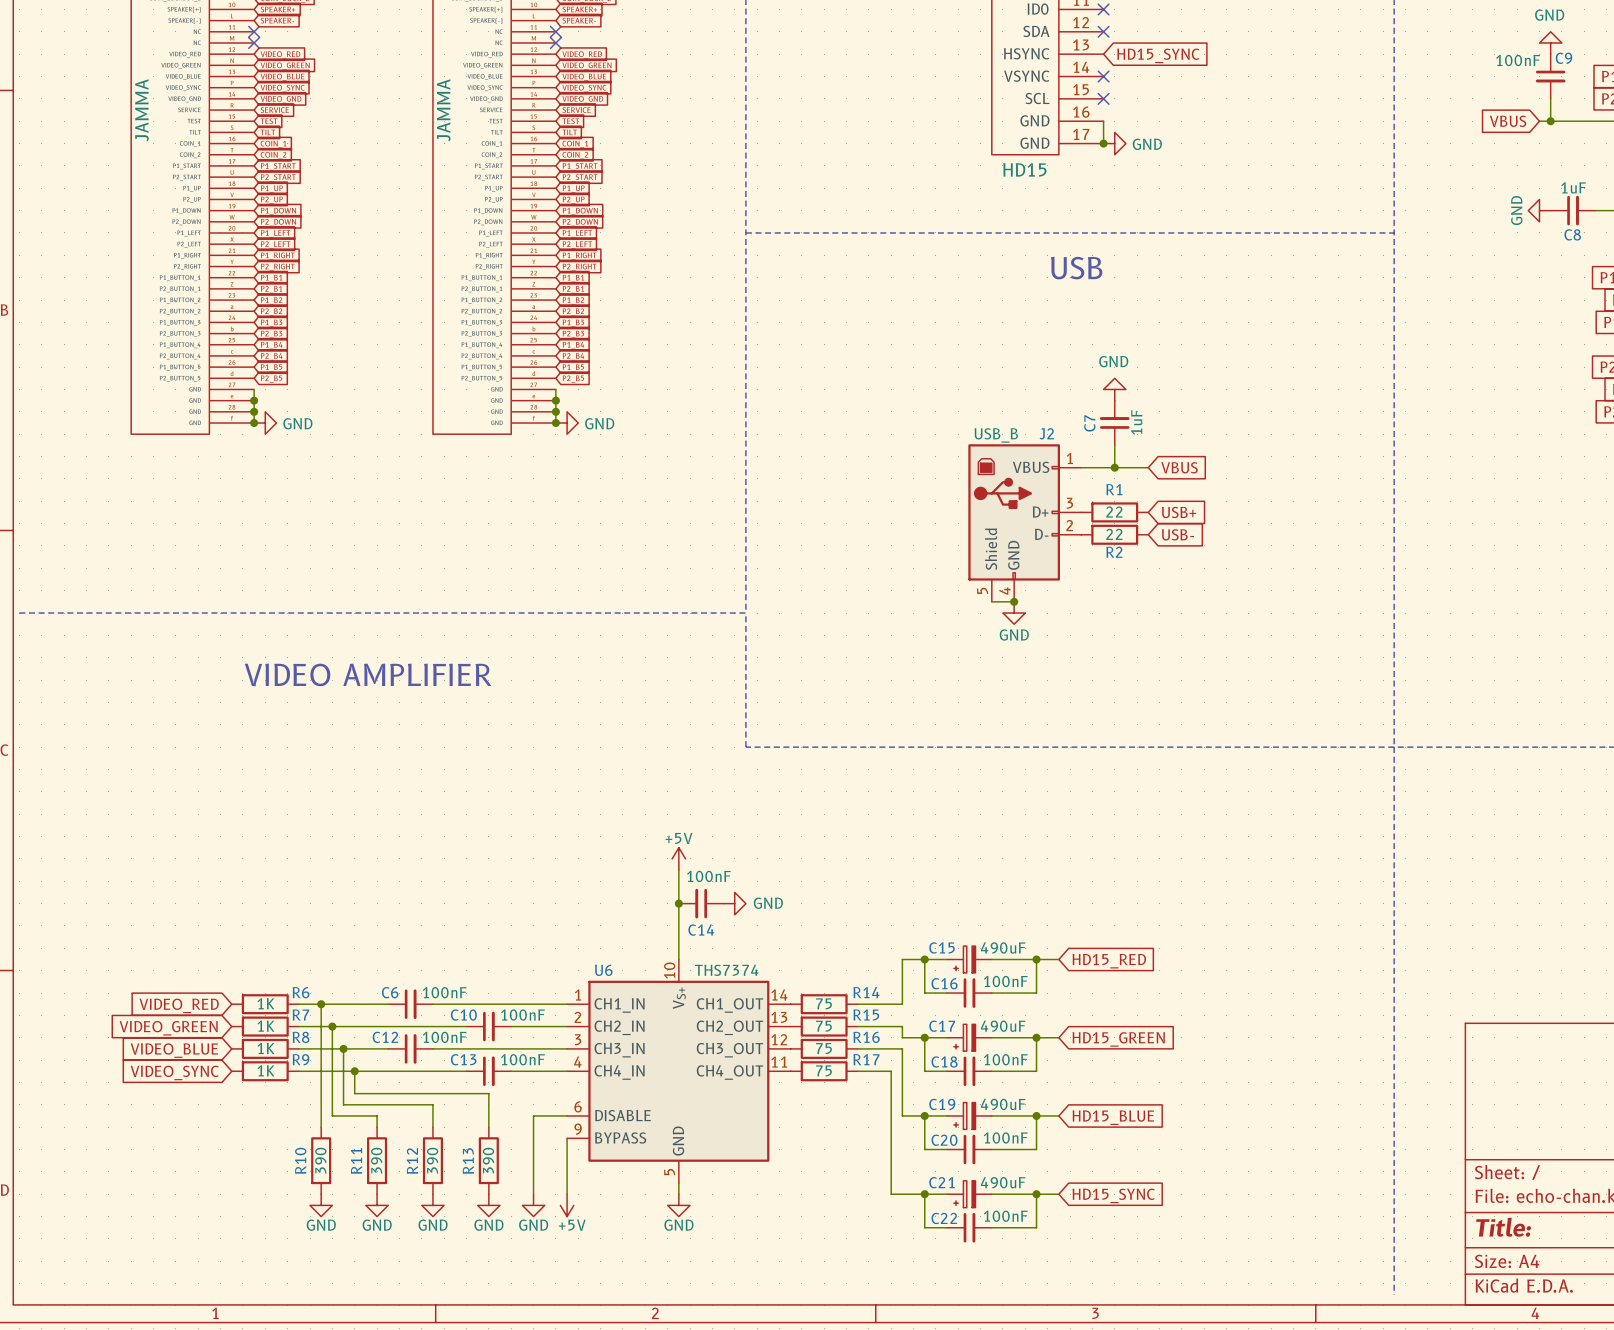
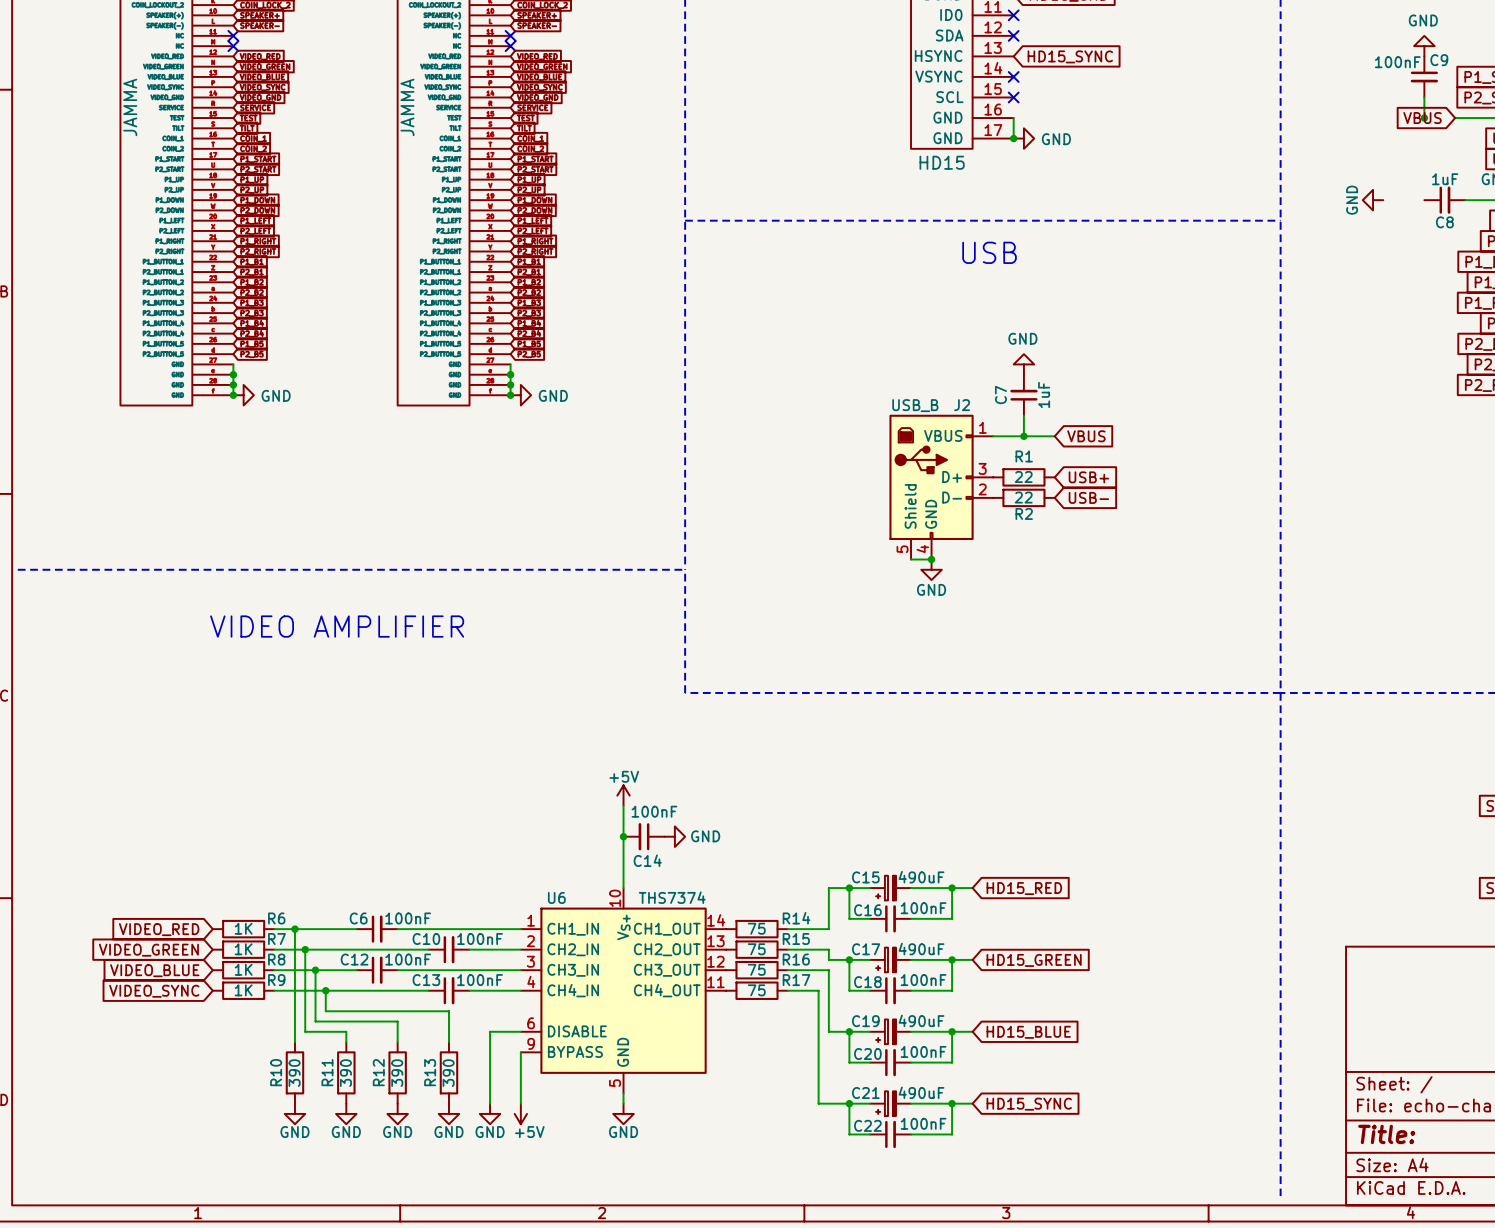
global label position: VBUS (1508, 121) -> VBUS (1422, 118)
wire: (1539, 121) (1584, 121) -> none
power symbol position: GND (1539, 210) -> GND (1373, 200)

